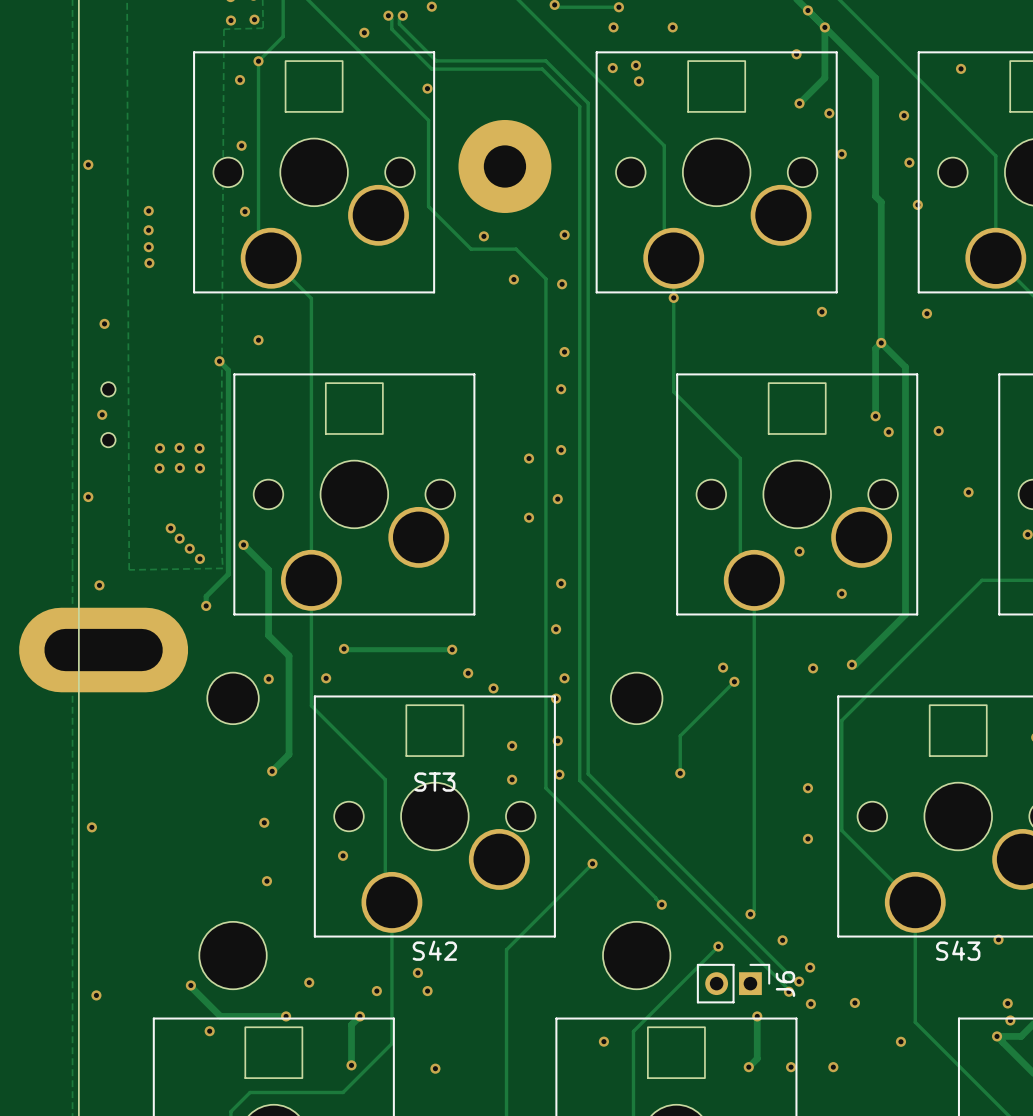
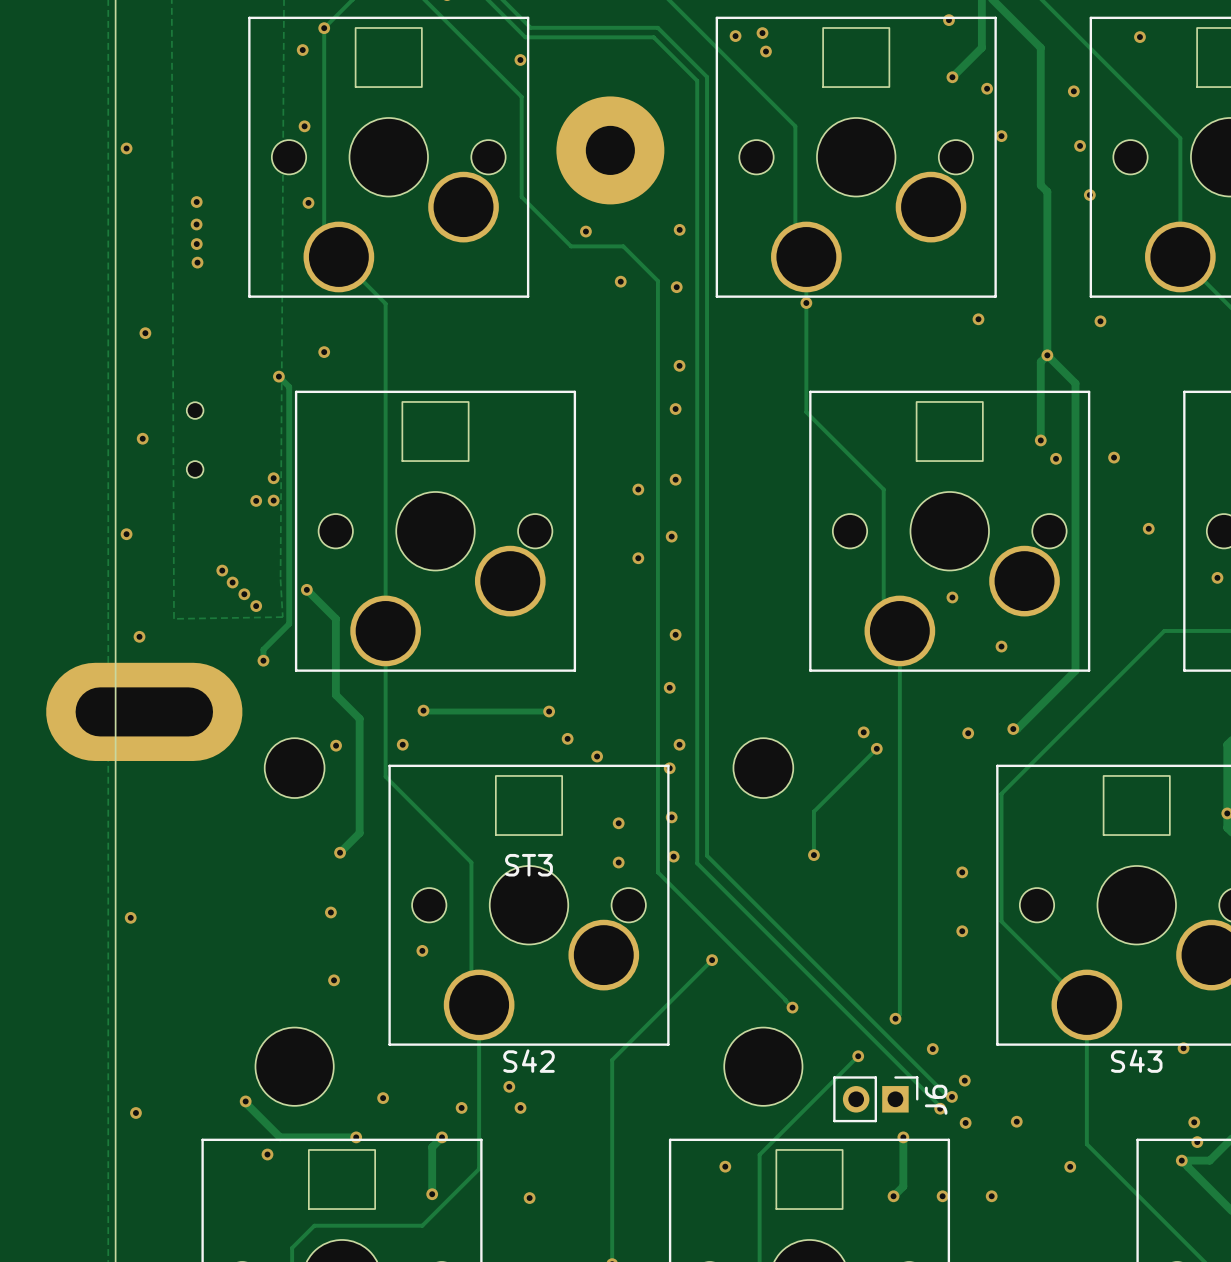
part position: (108, 414) -> (195, 440)
via: (179, 447) -> none
via: (159, 448) -> none
via: (199, 448) -> none
via: none -> (273, 478)
via: (159, 468) -> none
via: (179, 468) -> none
via: none -> (273, 500)

